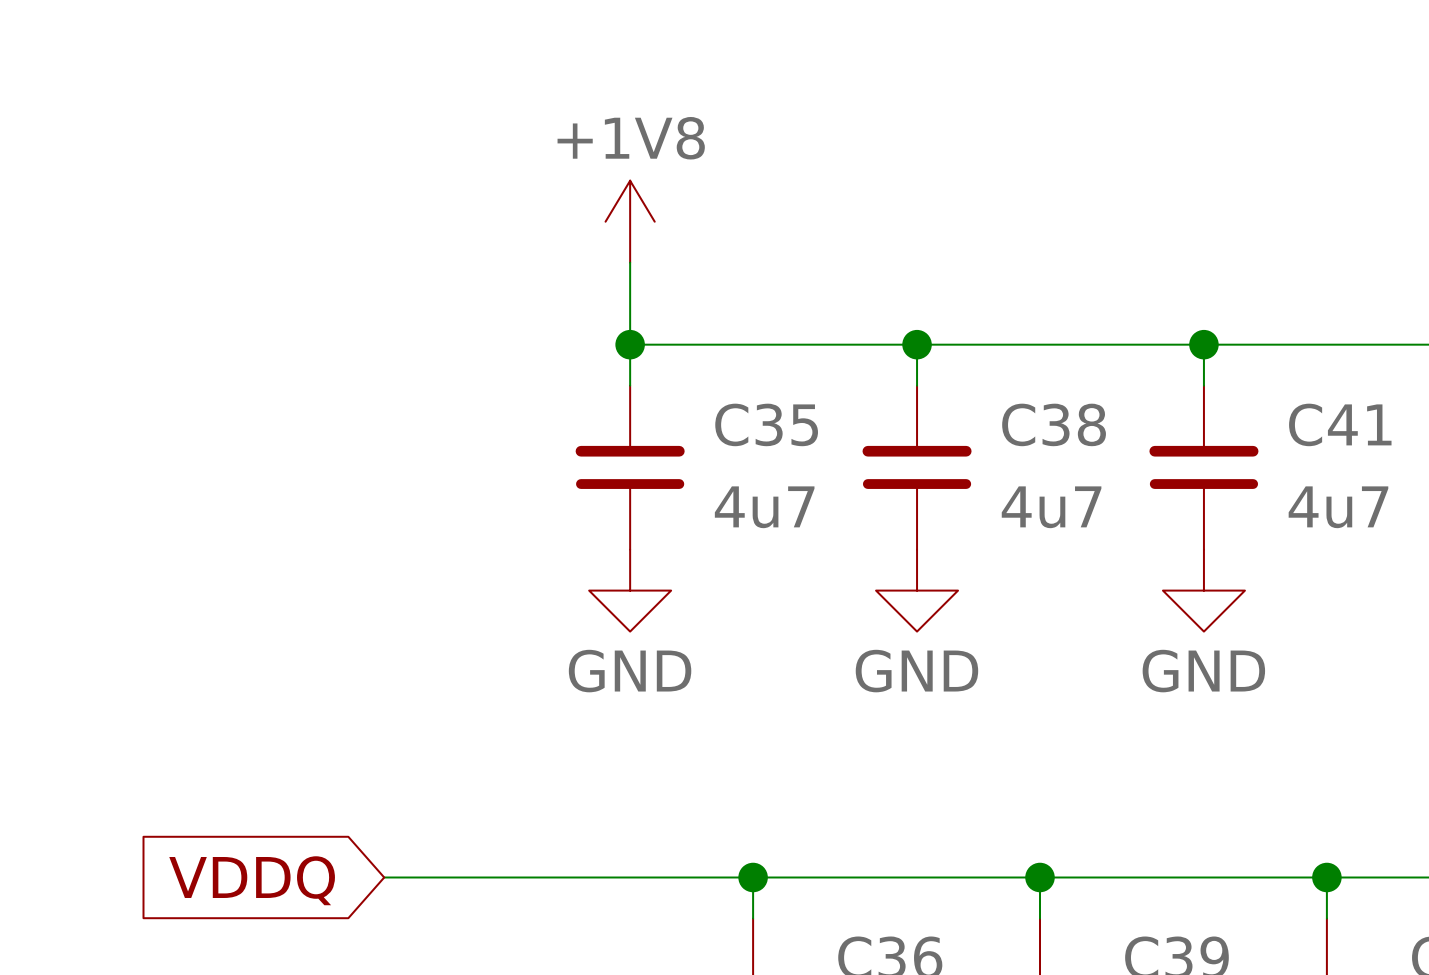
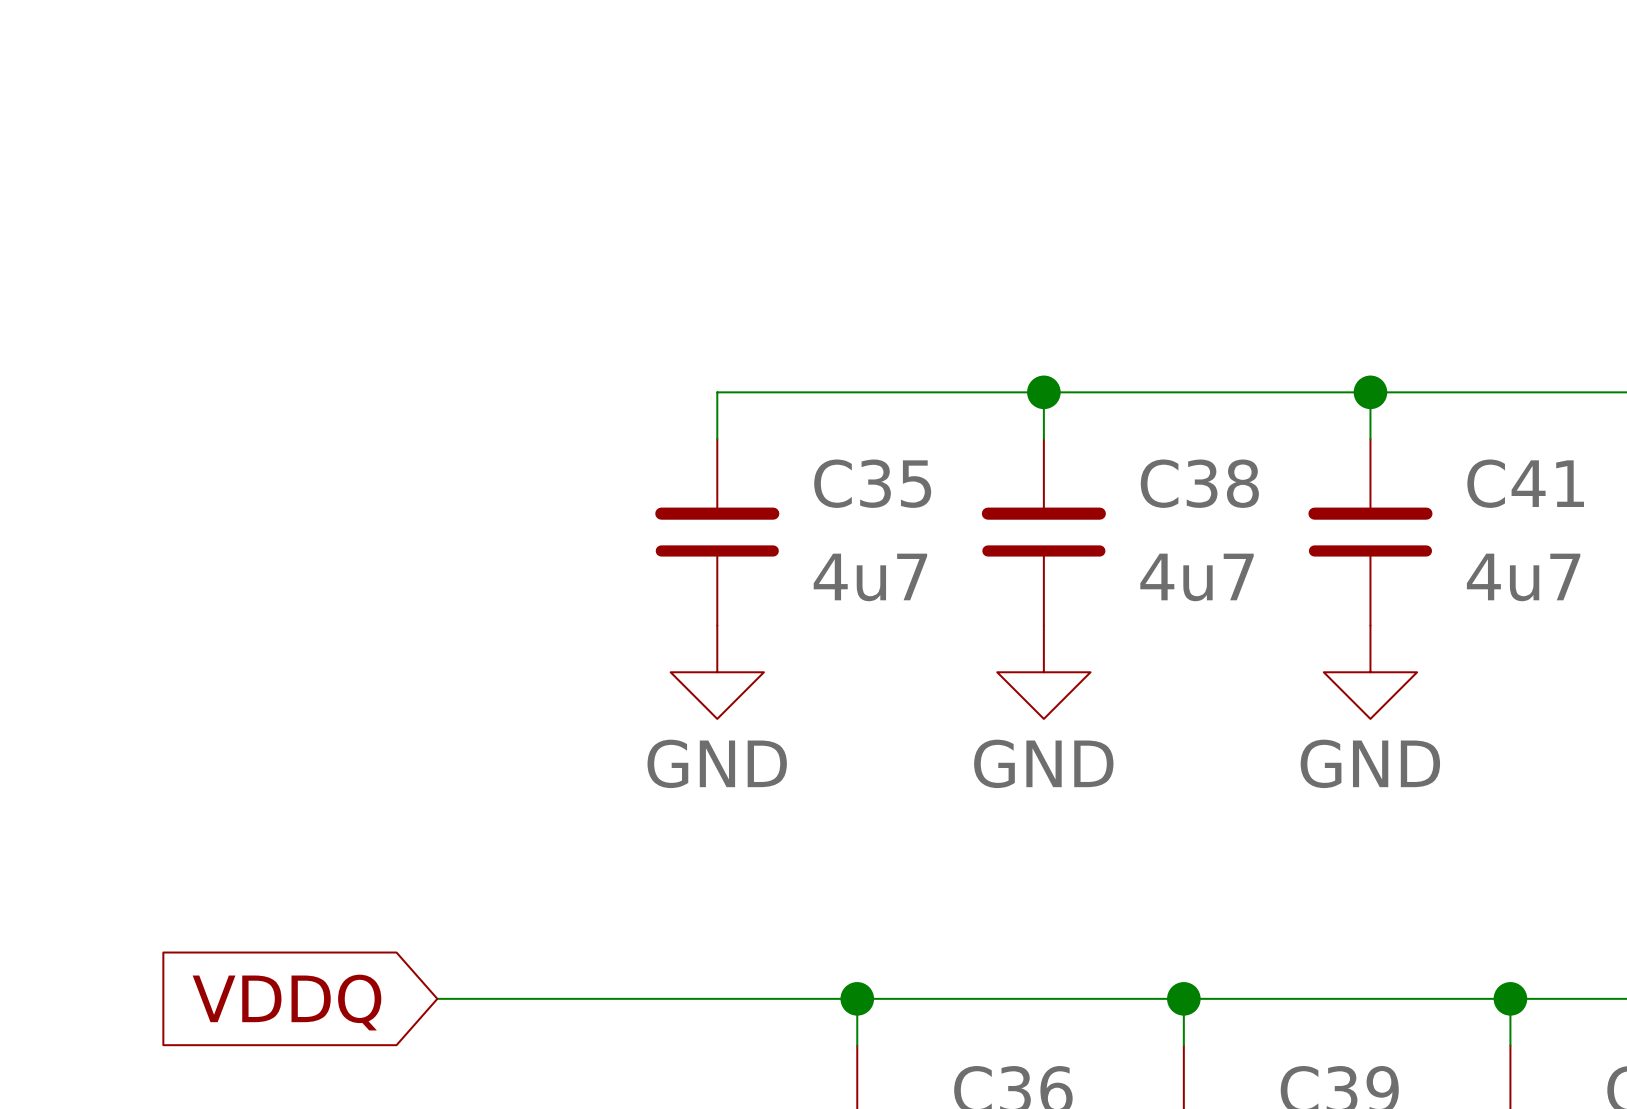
power symbol: +1V8 (630, 221) -> none
wire: (630, 262) (630, 344) -> none
junction: (630, 344) -> none

